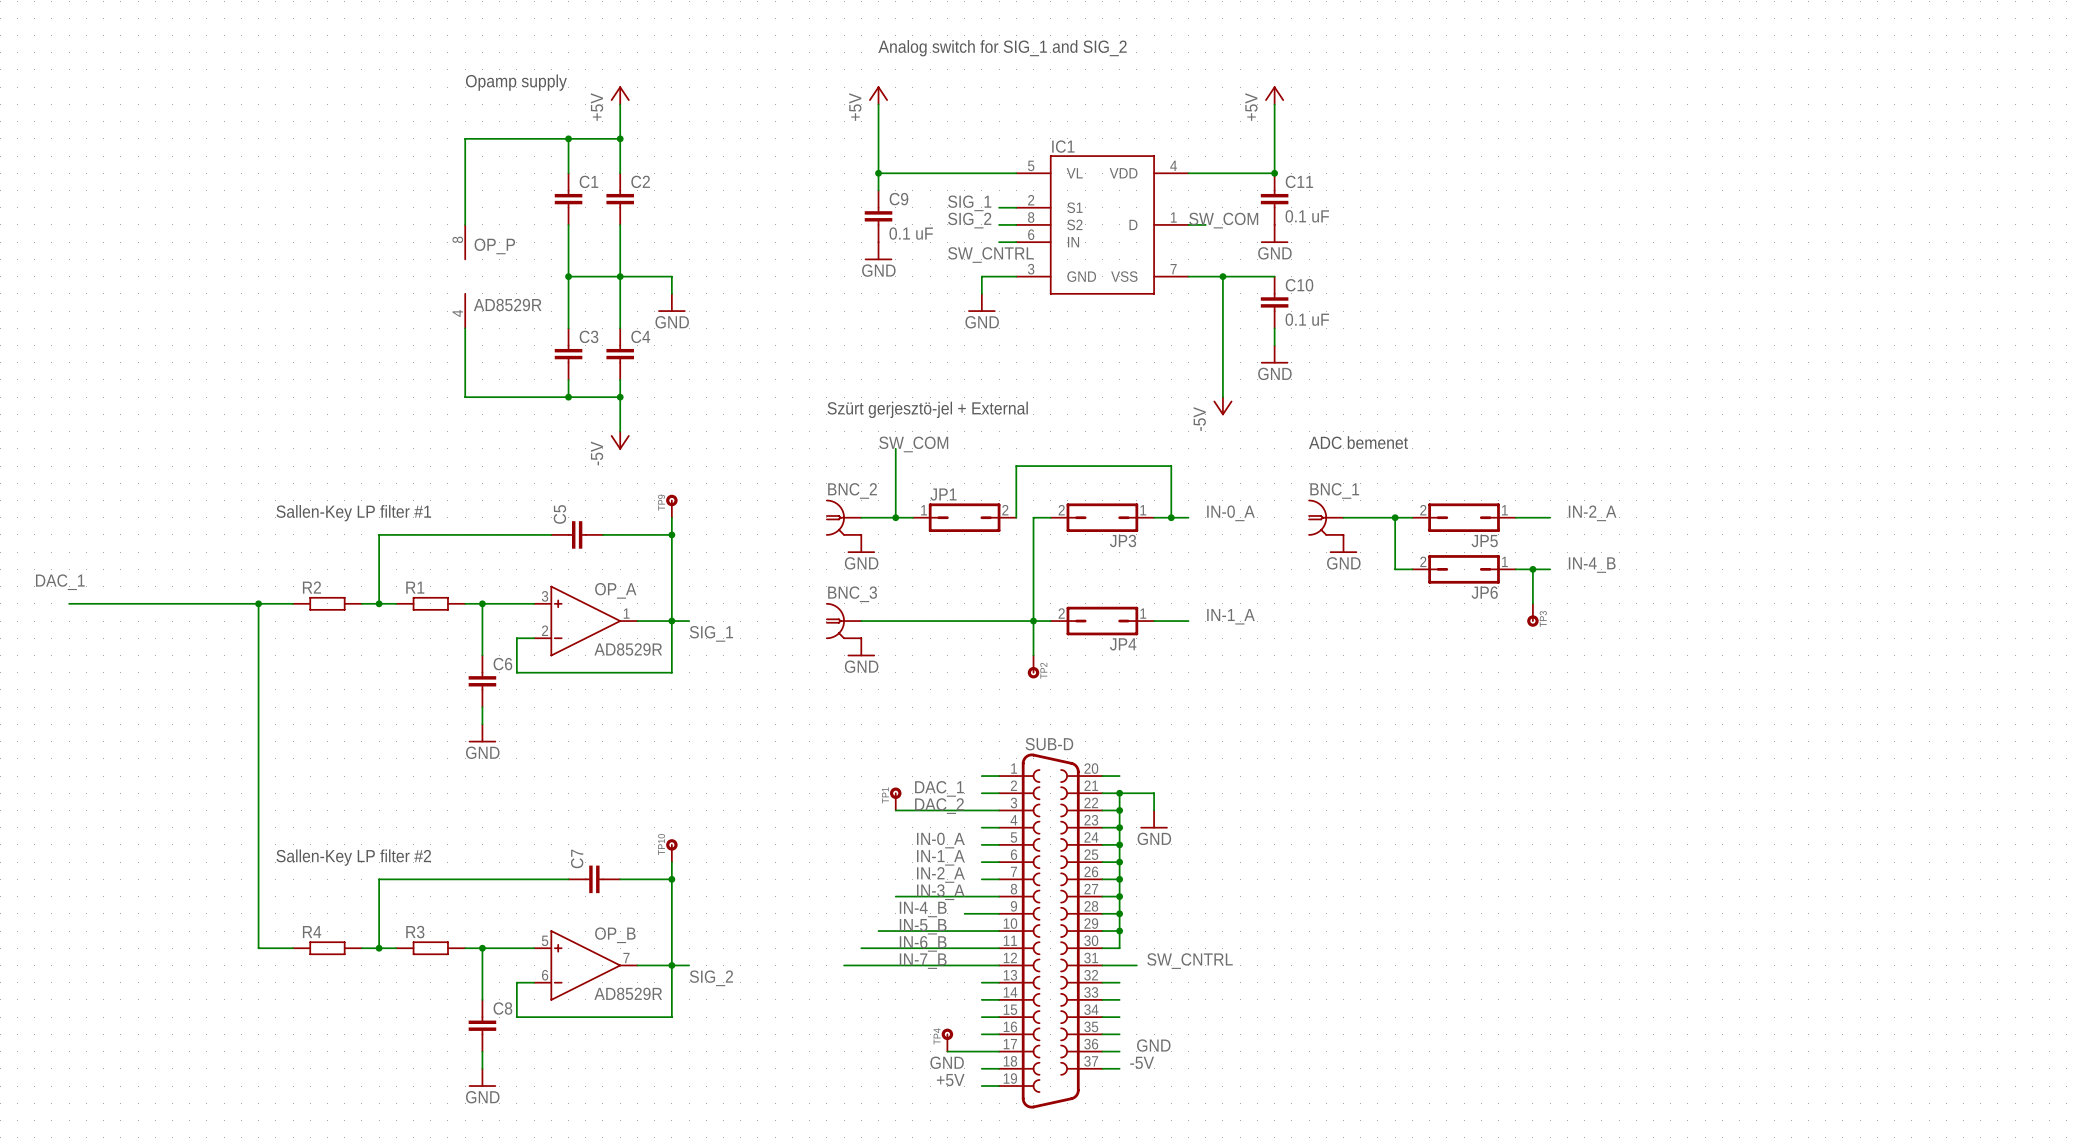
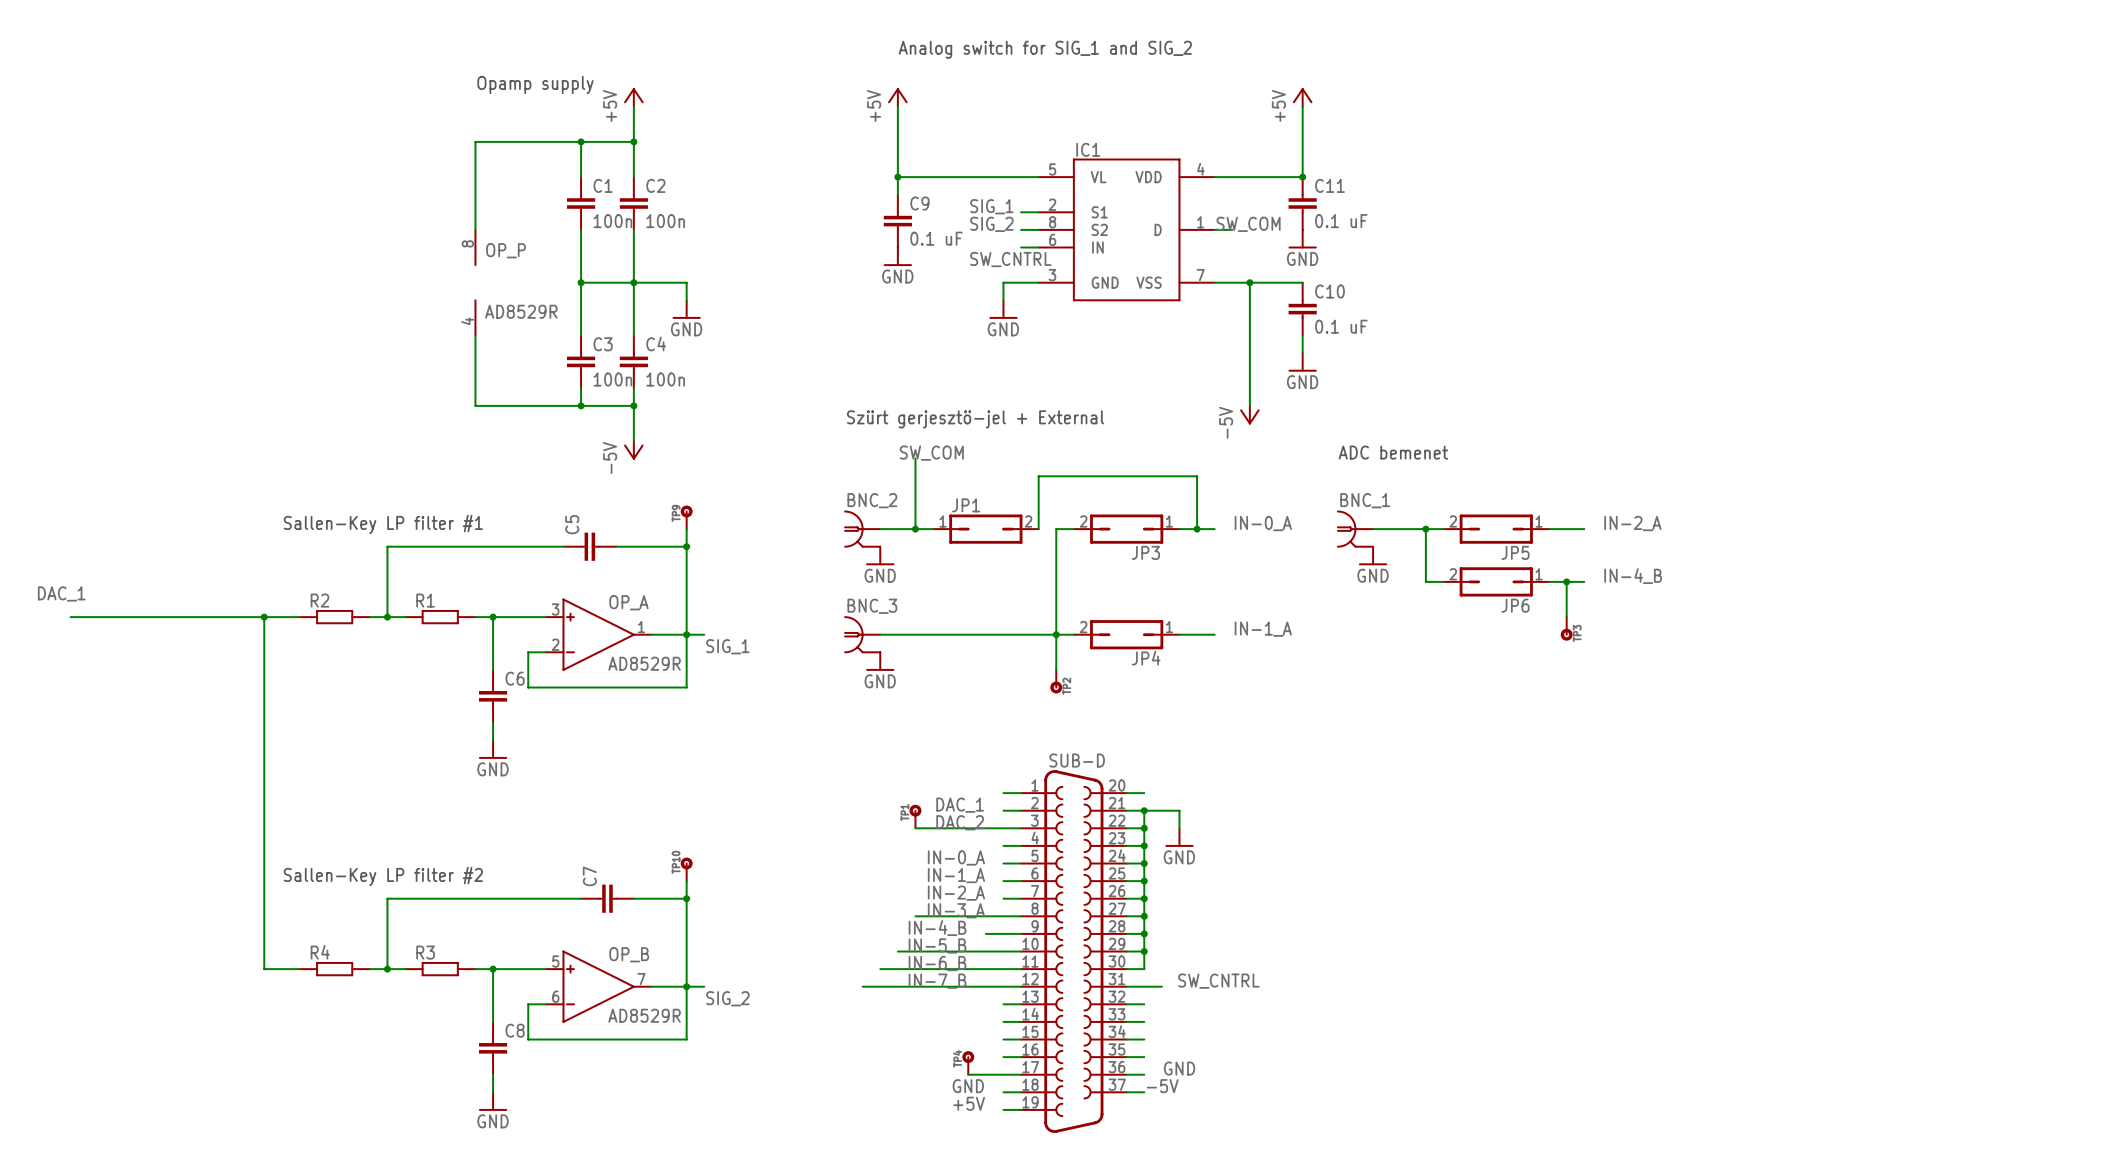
C1 value: none -> 100n (612, 221)
C2 value: none -> 100n (665, 221)
C3 value: none -> 100n (612, 379)
C4 value: none -> 100n (665, 379)

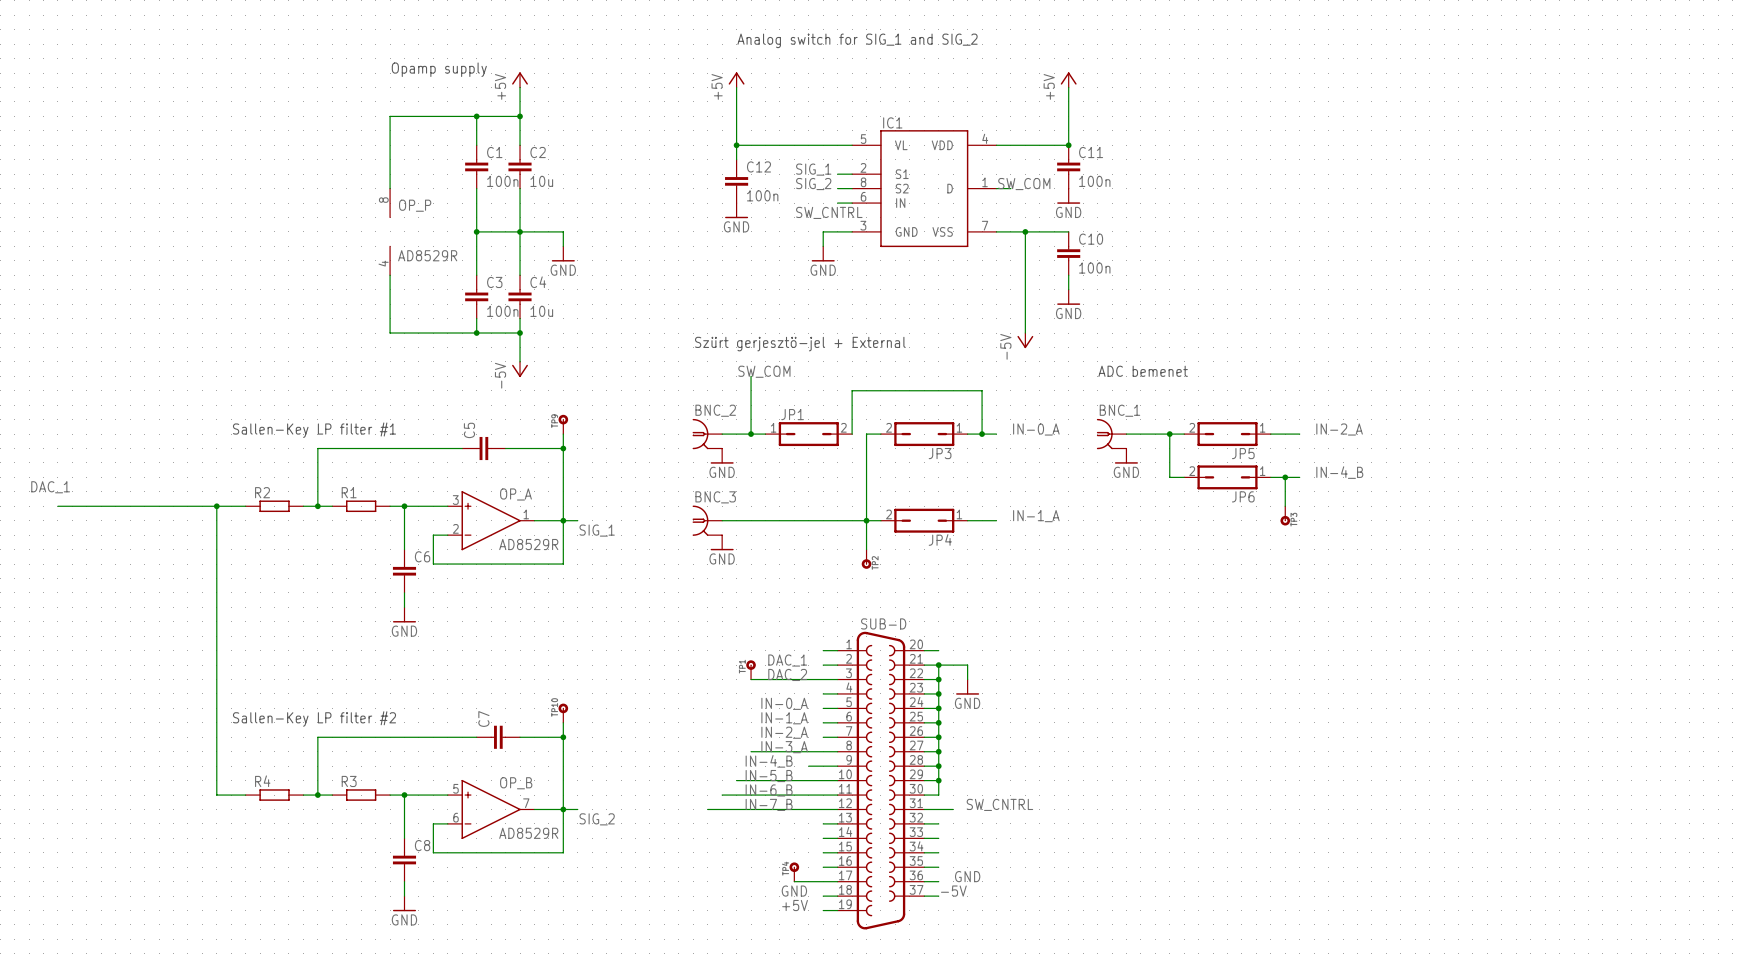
C9 name: C9 (919, 203) -> C12 (758, 166)
C2 value: 100n (665, 221) -> 10u (541, 181)
C11 value: 0.1 uF (1341, 221) -> 100n (1094, 181)
C9 value: 0.1 uF (936, 238) -> 100n (762, 195)
C10 value: 0.1 uF (1341, 326) -> 100n (1094, 268)
C4 value: 100n (665, 379) -> 10u (541, 311)

